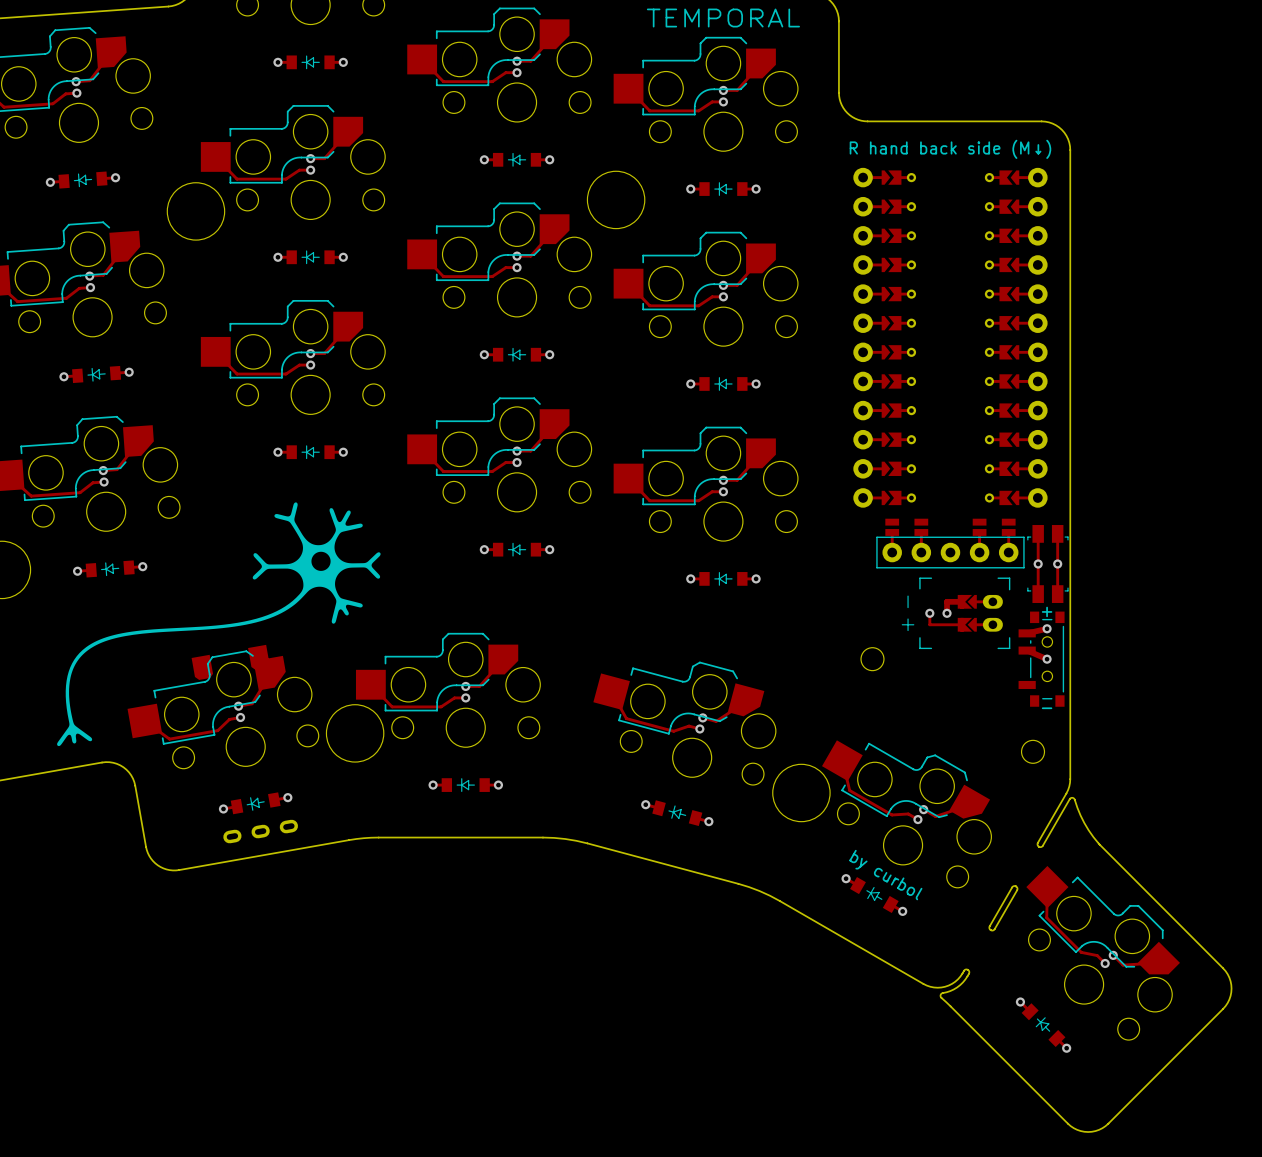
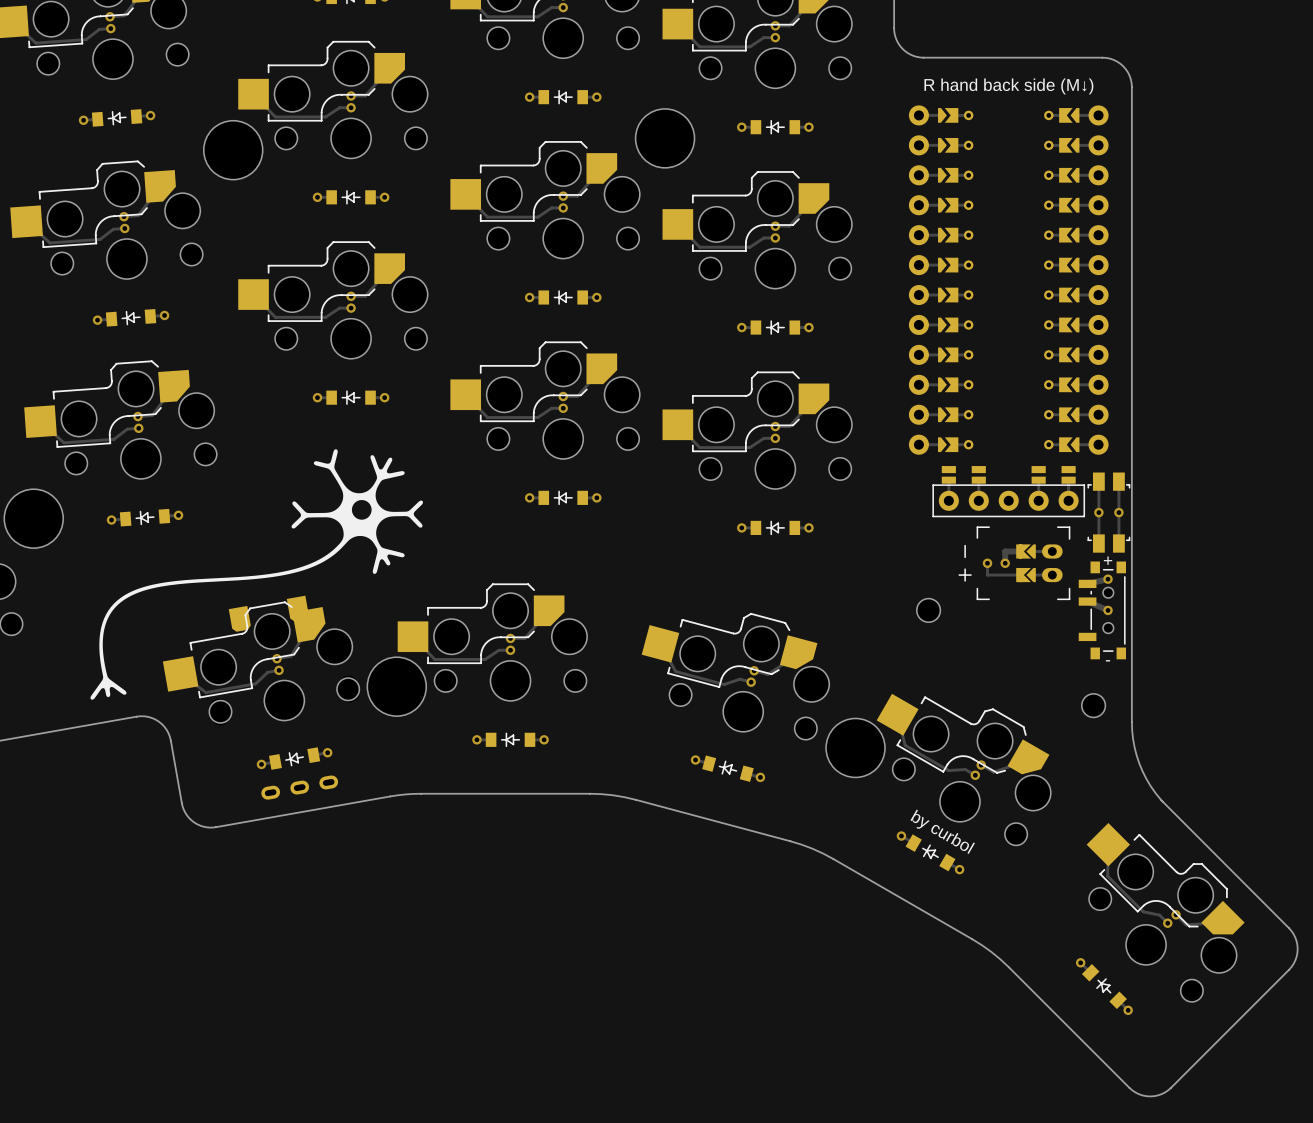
board edge: (1070, 768) (1068, 790) (1037, 845) (1042, 846) (1072, 797) (1074, 799) (1084, 823) (1098, 843) -> (1131, 722) (1134, 747) (1139, 763) (1146, 779) (1161, 800)
board edge: (1015, 886) (1017, 890) (994, 929) (990, 930) (989, 926) (1012, 887) (1015, 886) -> none
board edge: (967, 969) (964, 970) (955, 981) (941, 987) (930, 986) (915, 979) -> (1008, 967) (991, 952) (972, 939)
board edge: (967, 969) (968, 973) (960, 985) (940, 994) (941, 997) (950, 1006) -> none

